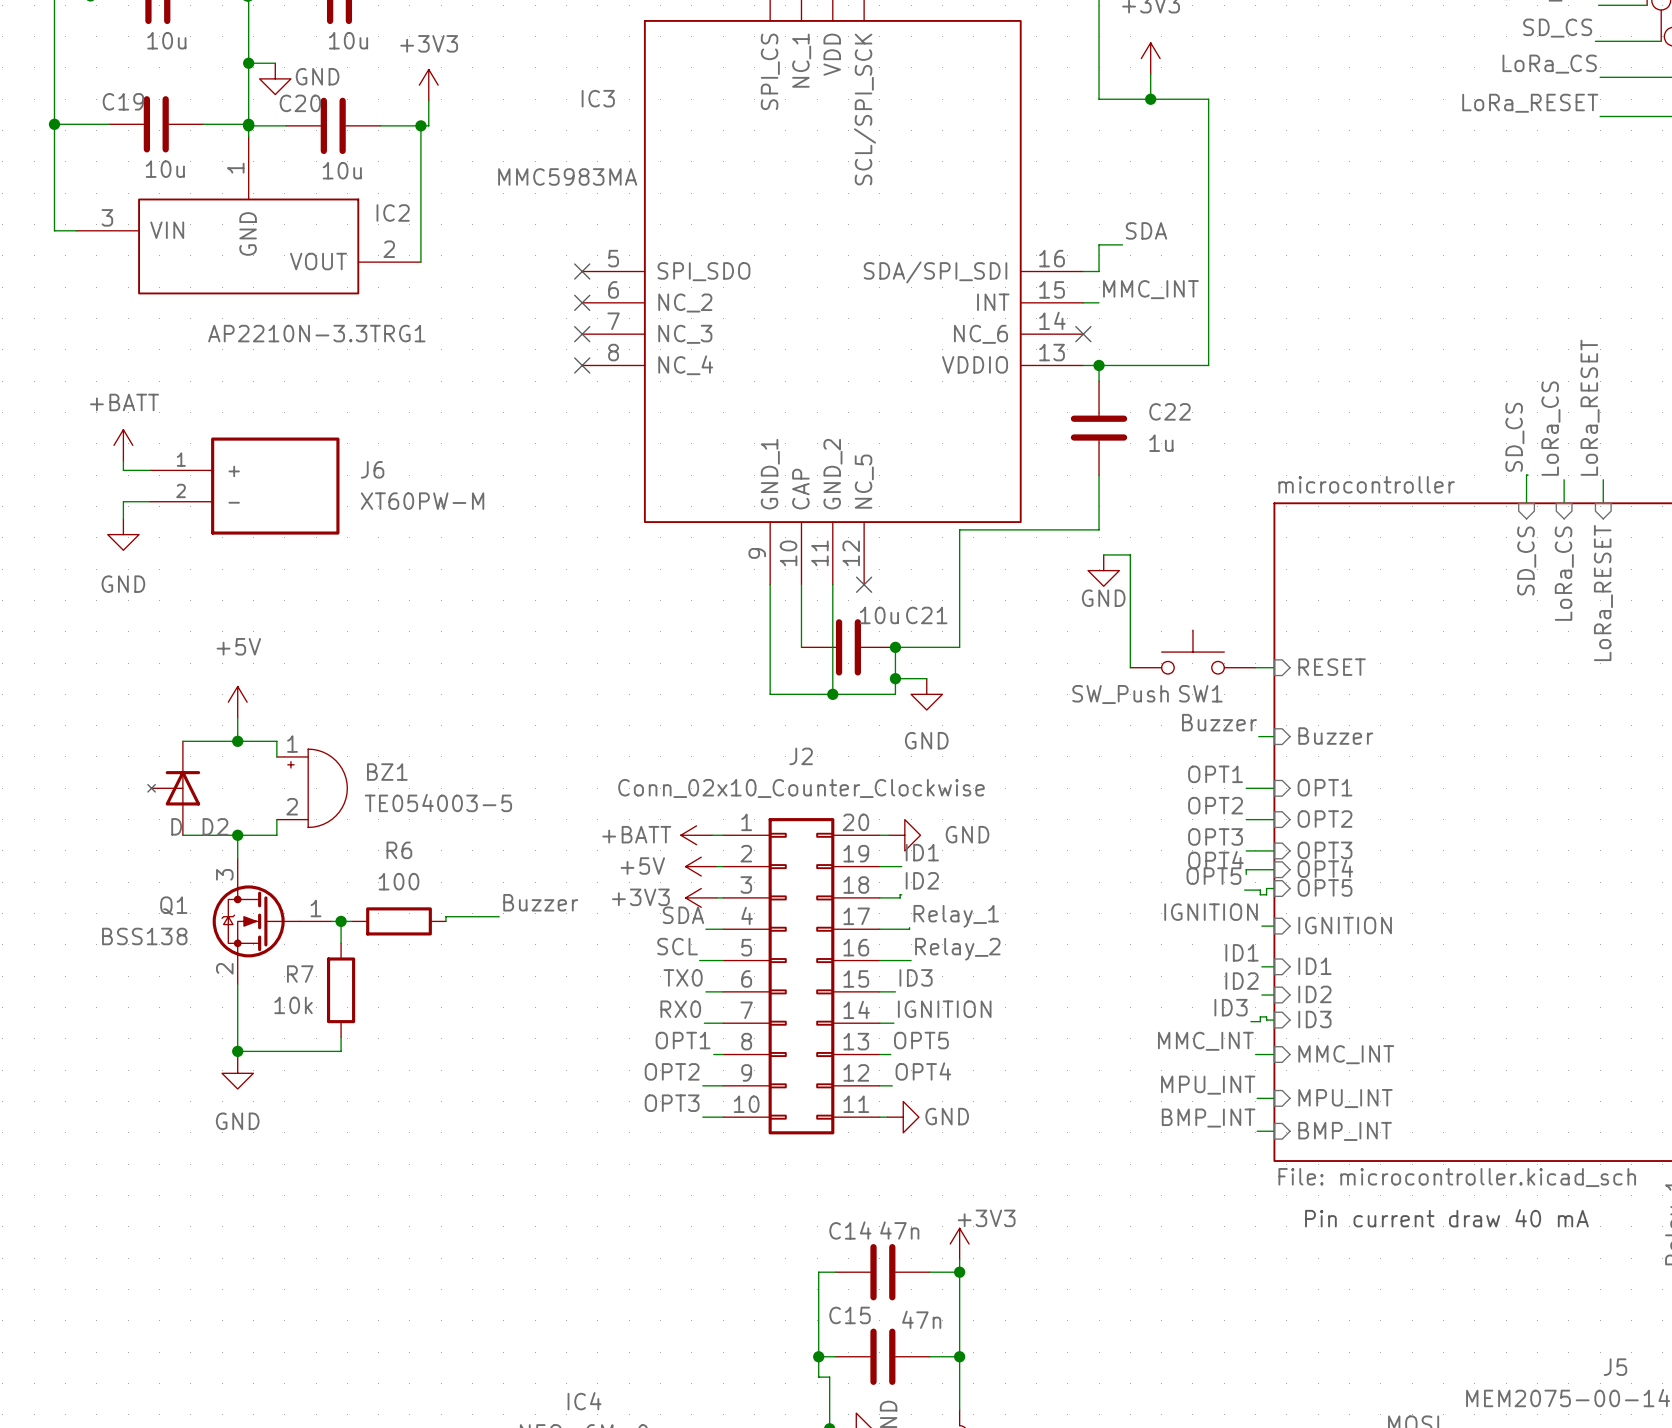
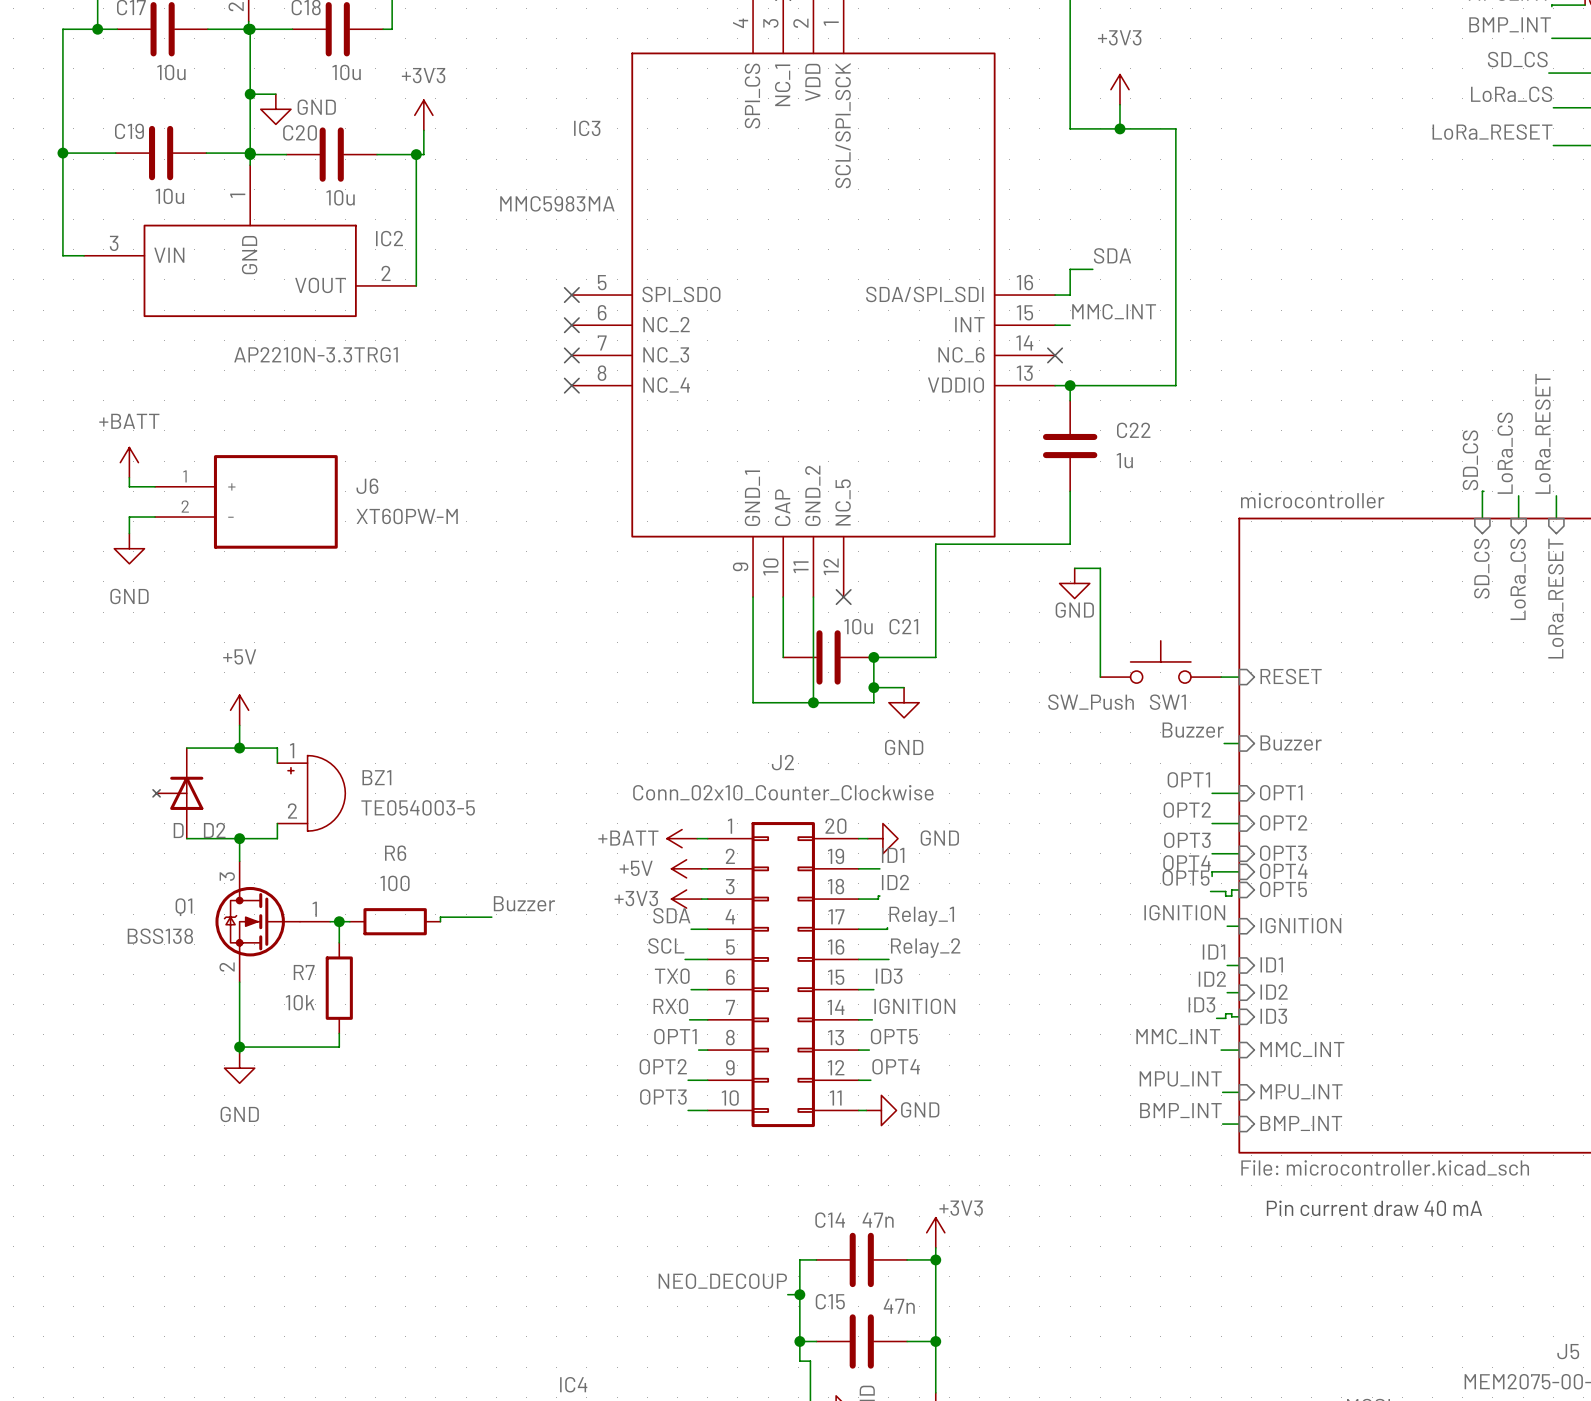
label: none -> NEO_DECOUP (722, 1281)
wire: none -> (787, 1294) (799, 1294)
junction: none -> (799, 1294)

